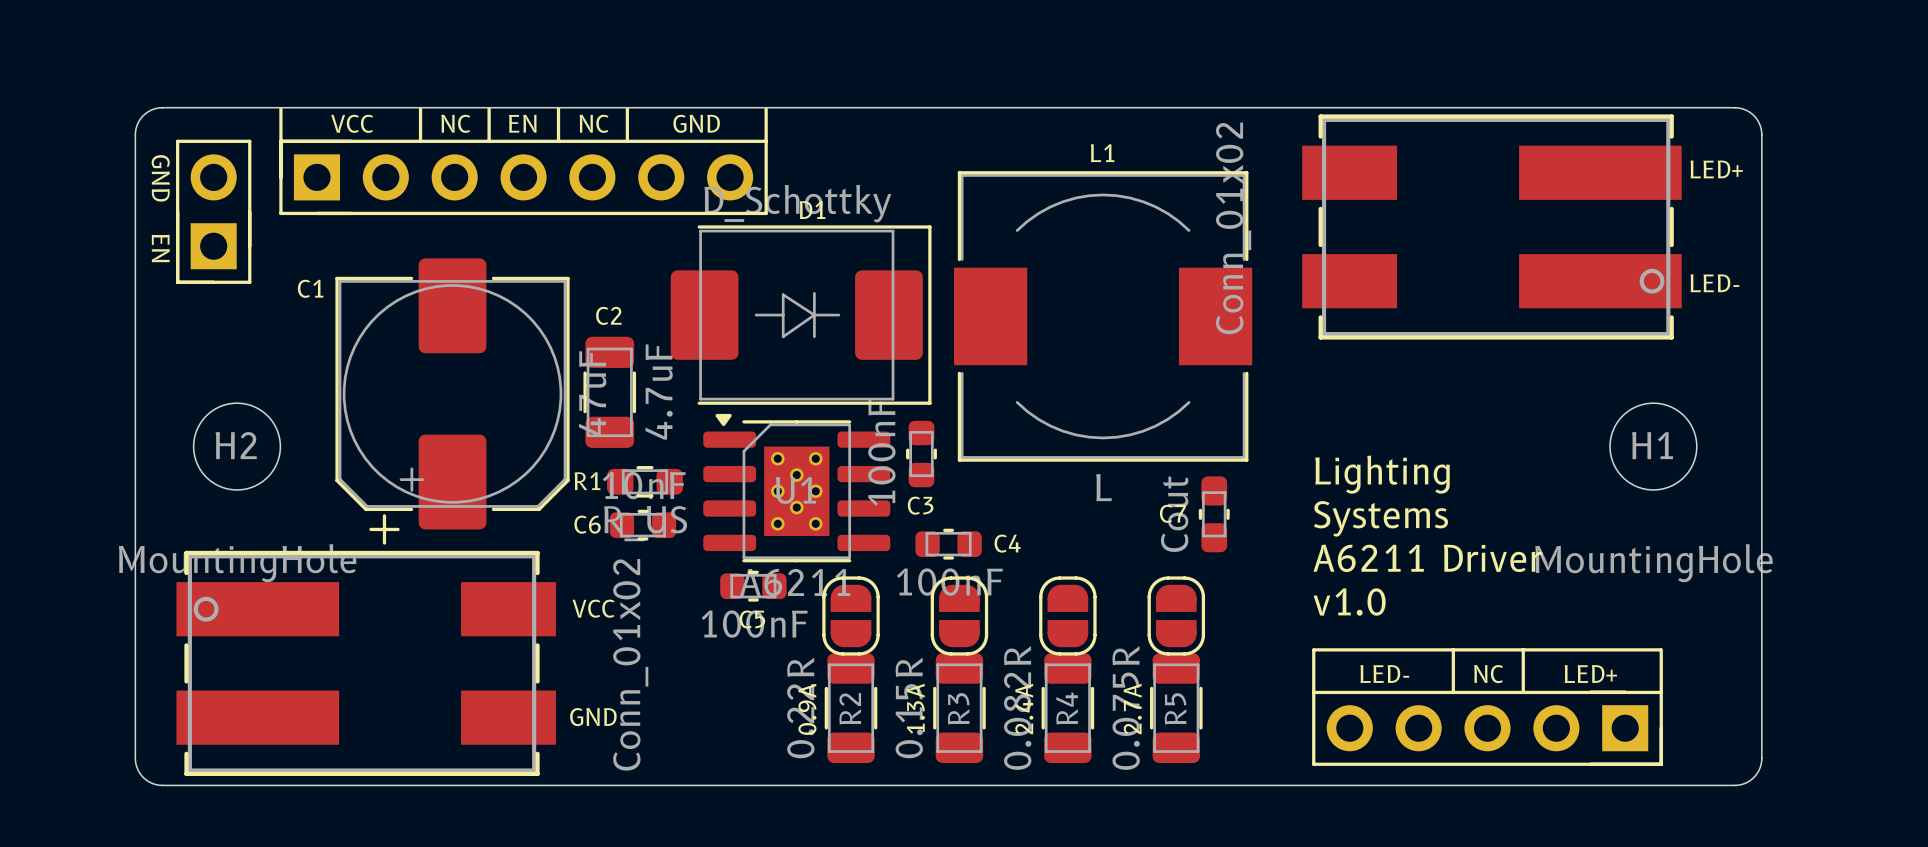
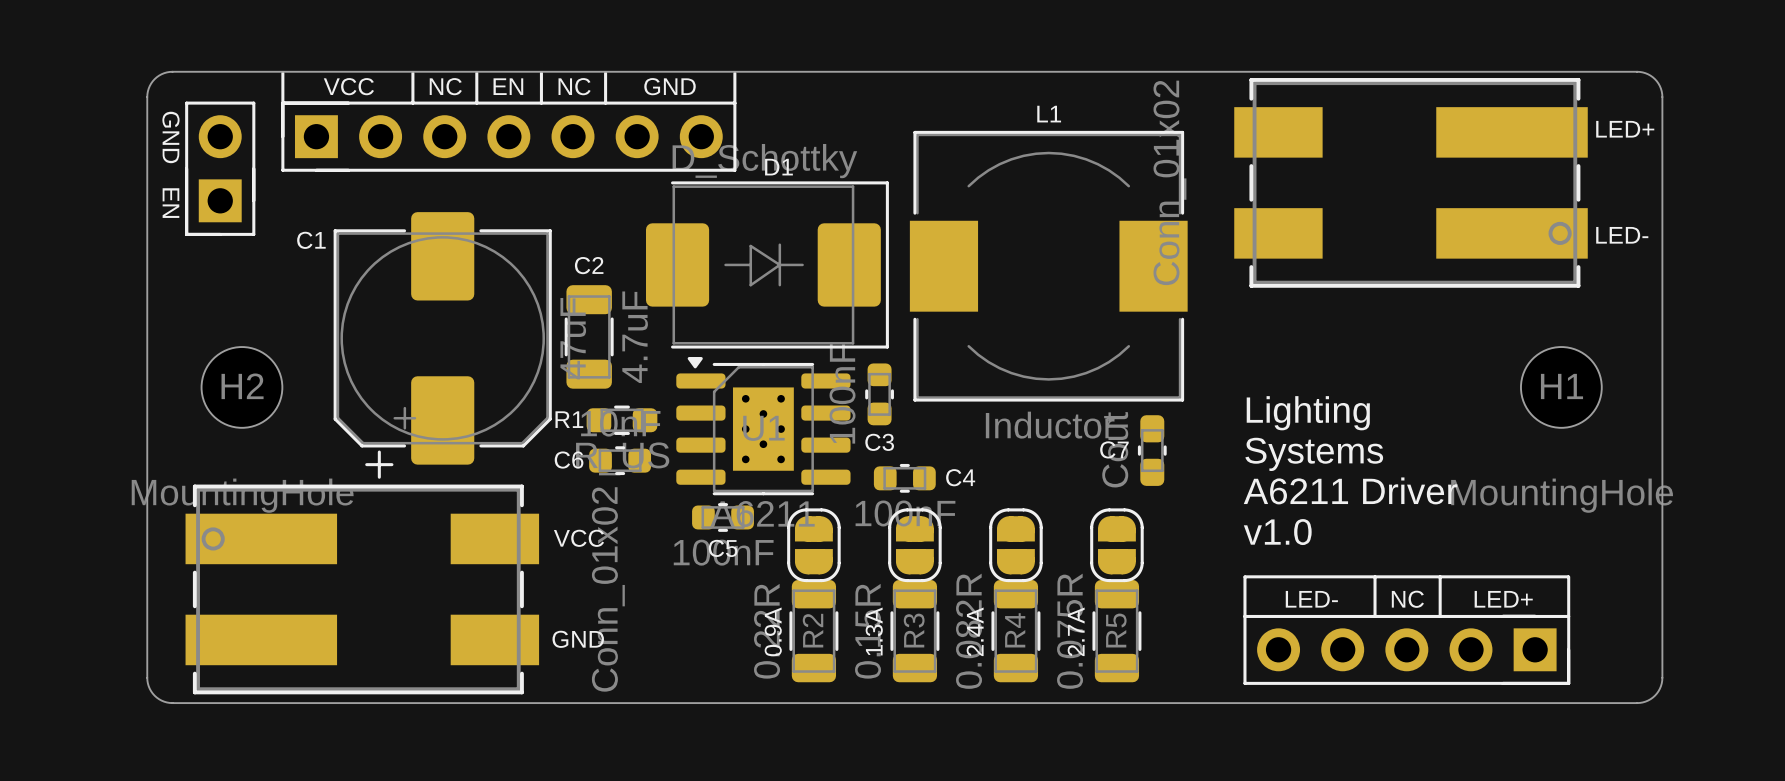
L1 value: L (1104, 487) -> Inductor (1050, 425)

